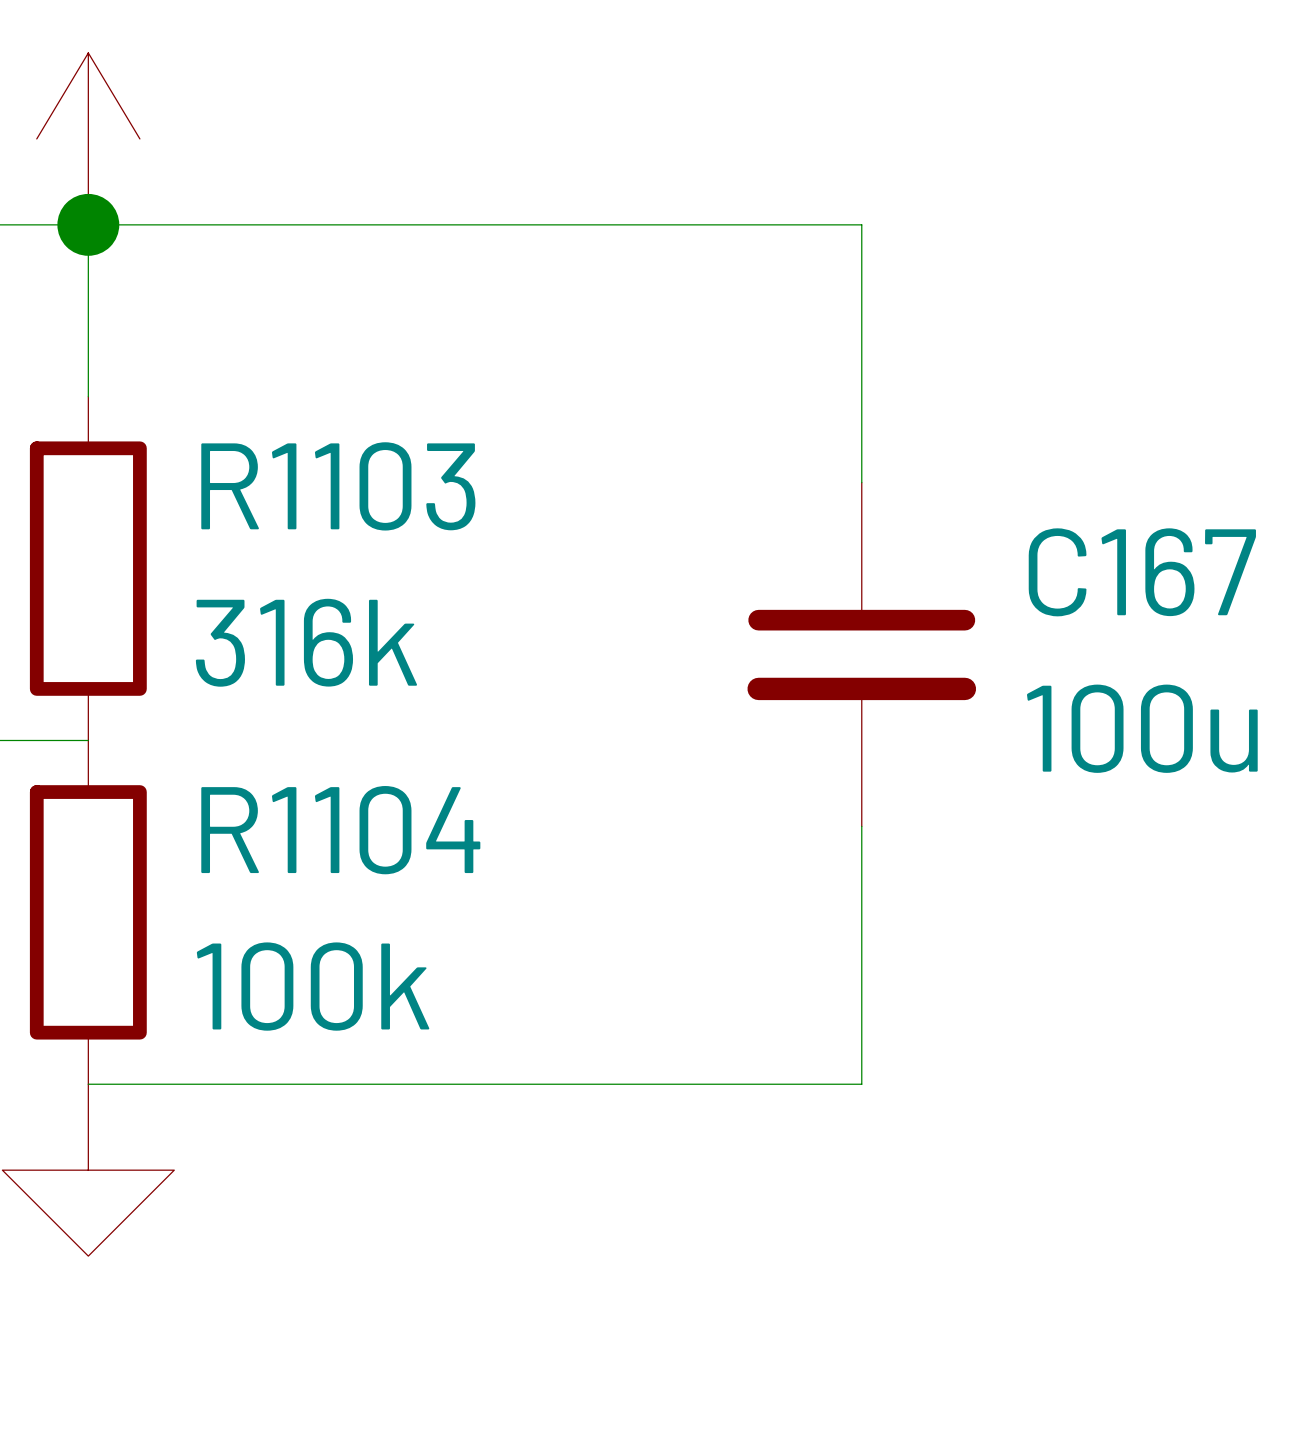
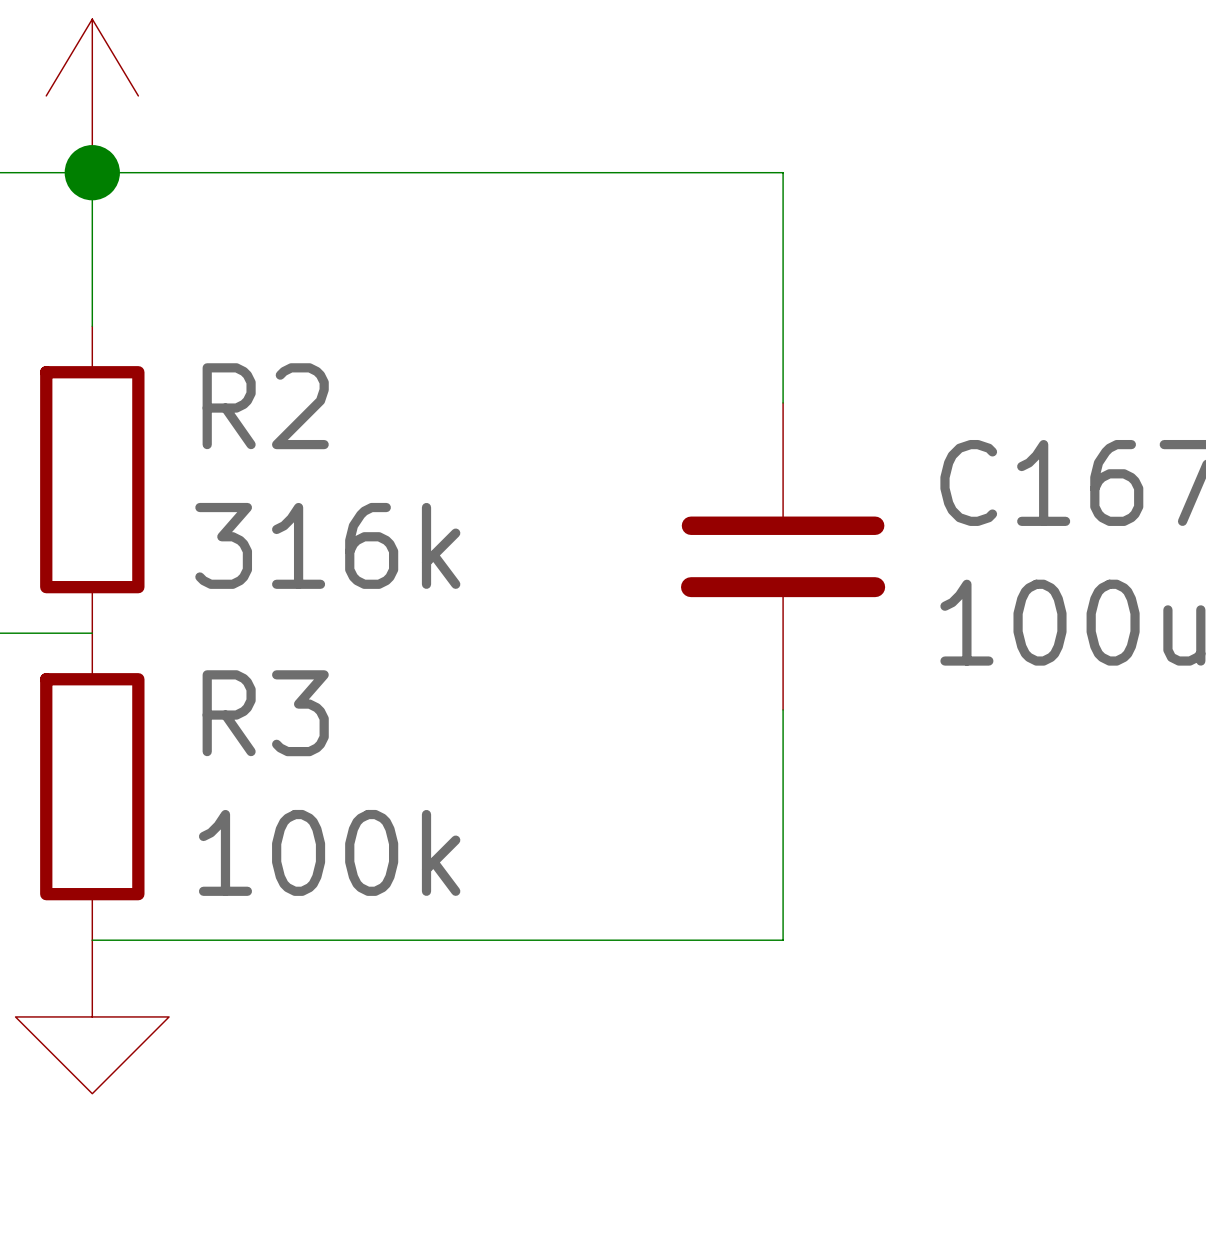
R1103 name: R1103 (338, 486) -> R2 (265, 406)
R1104 name: R1104 (340, 830) -> R3 (265, 713)

